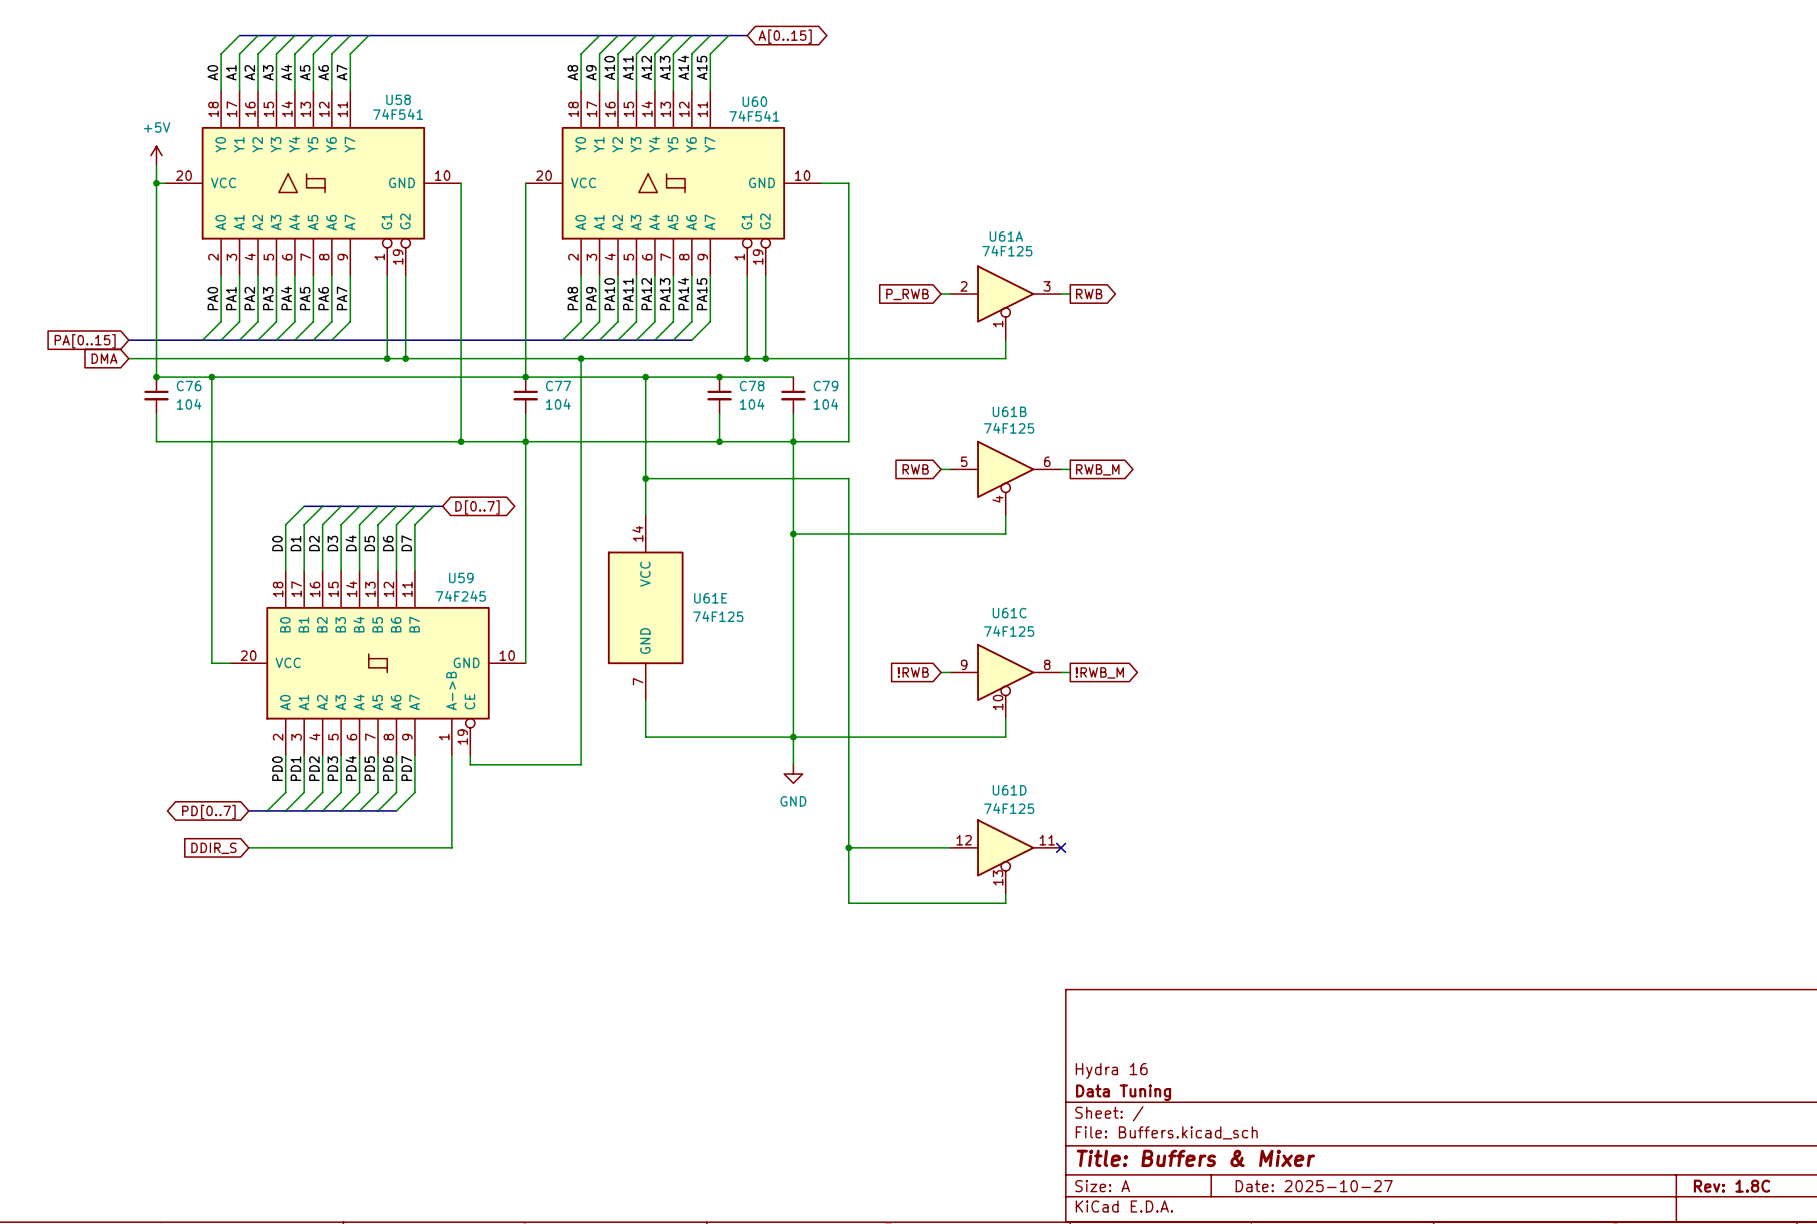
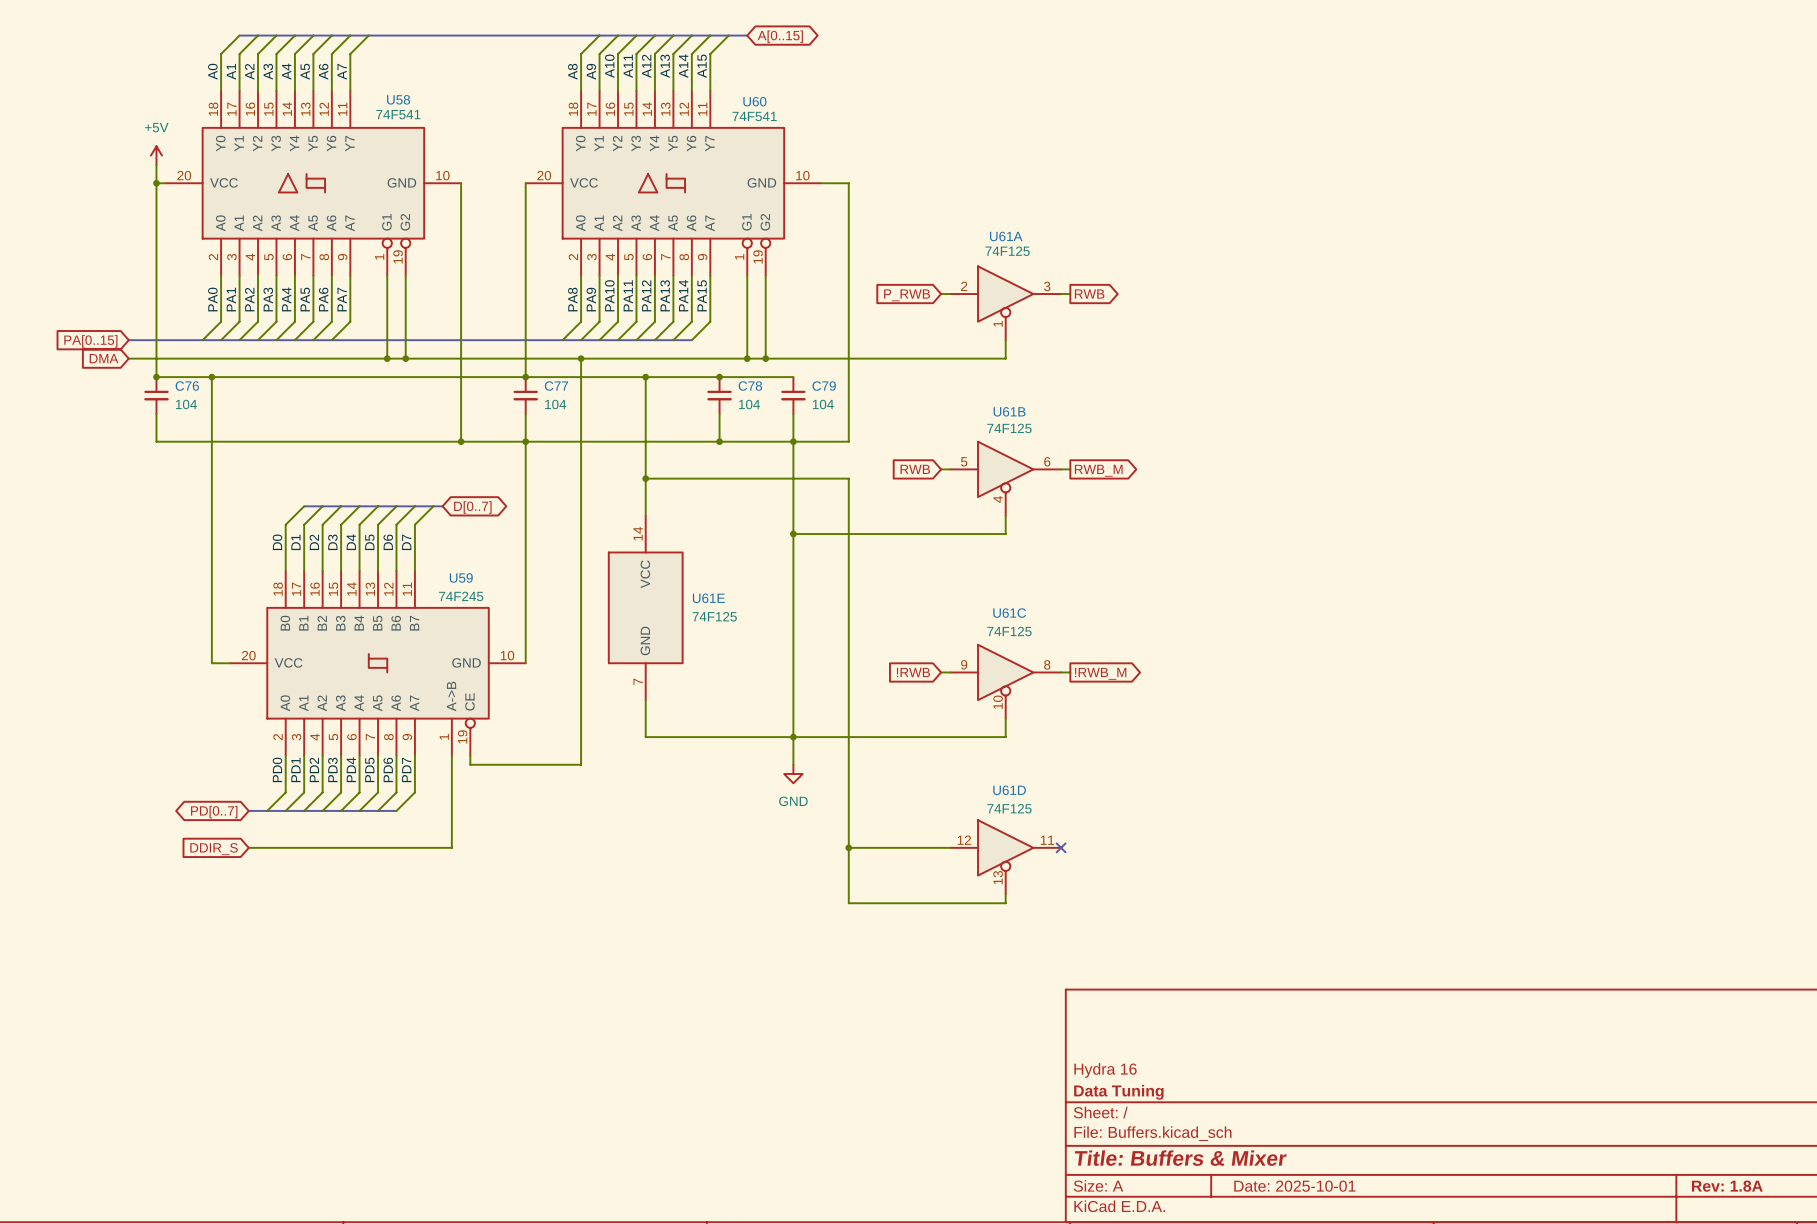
title block: Date: 2025-10-27 (1314, 1186) -> Date: 2025-10-01 (1294, 1186)
title block: Rev: 1.8C (1732, 1186) -> Rev: 1.8A (1727, 1186)

